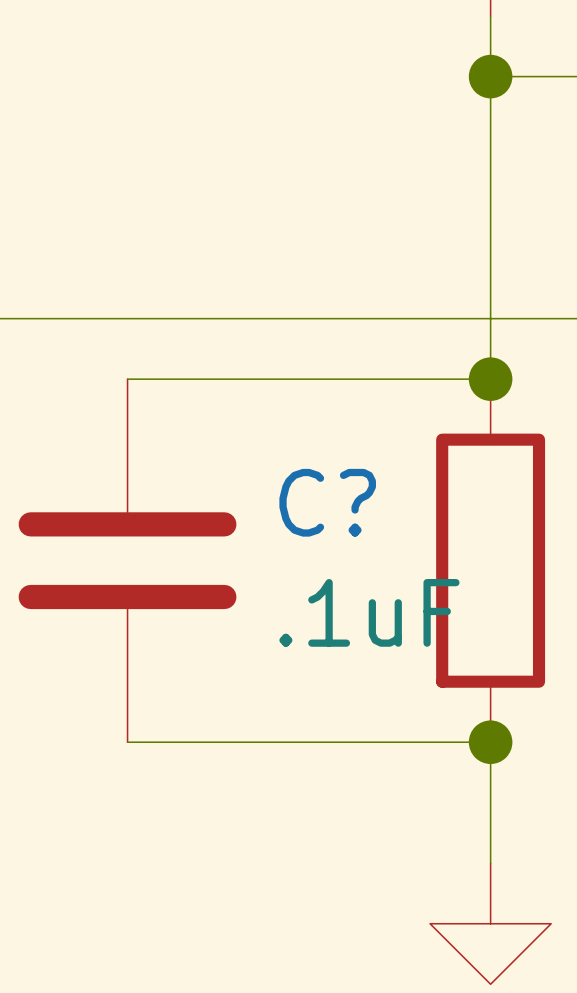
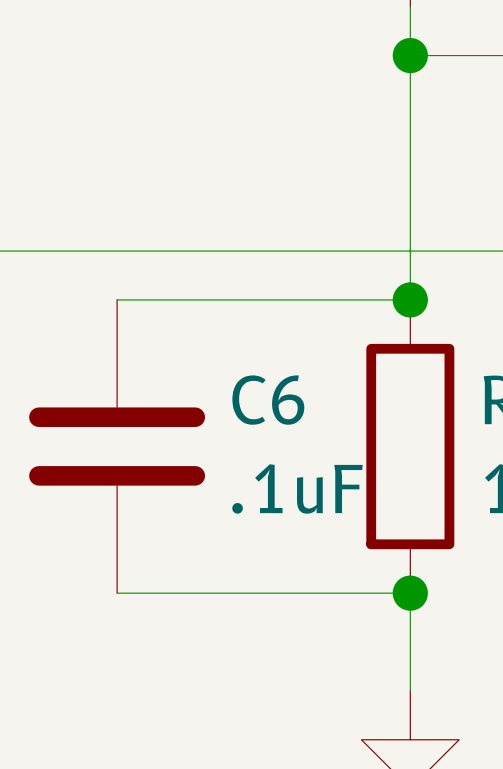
C? name: C? (327, 502) -> C6 (268, 400)

